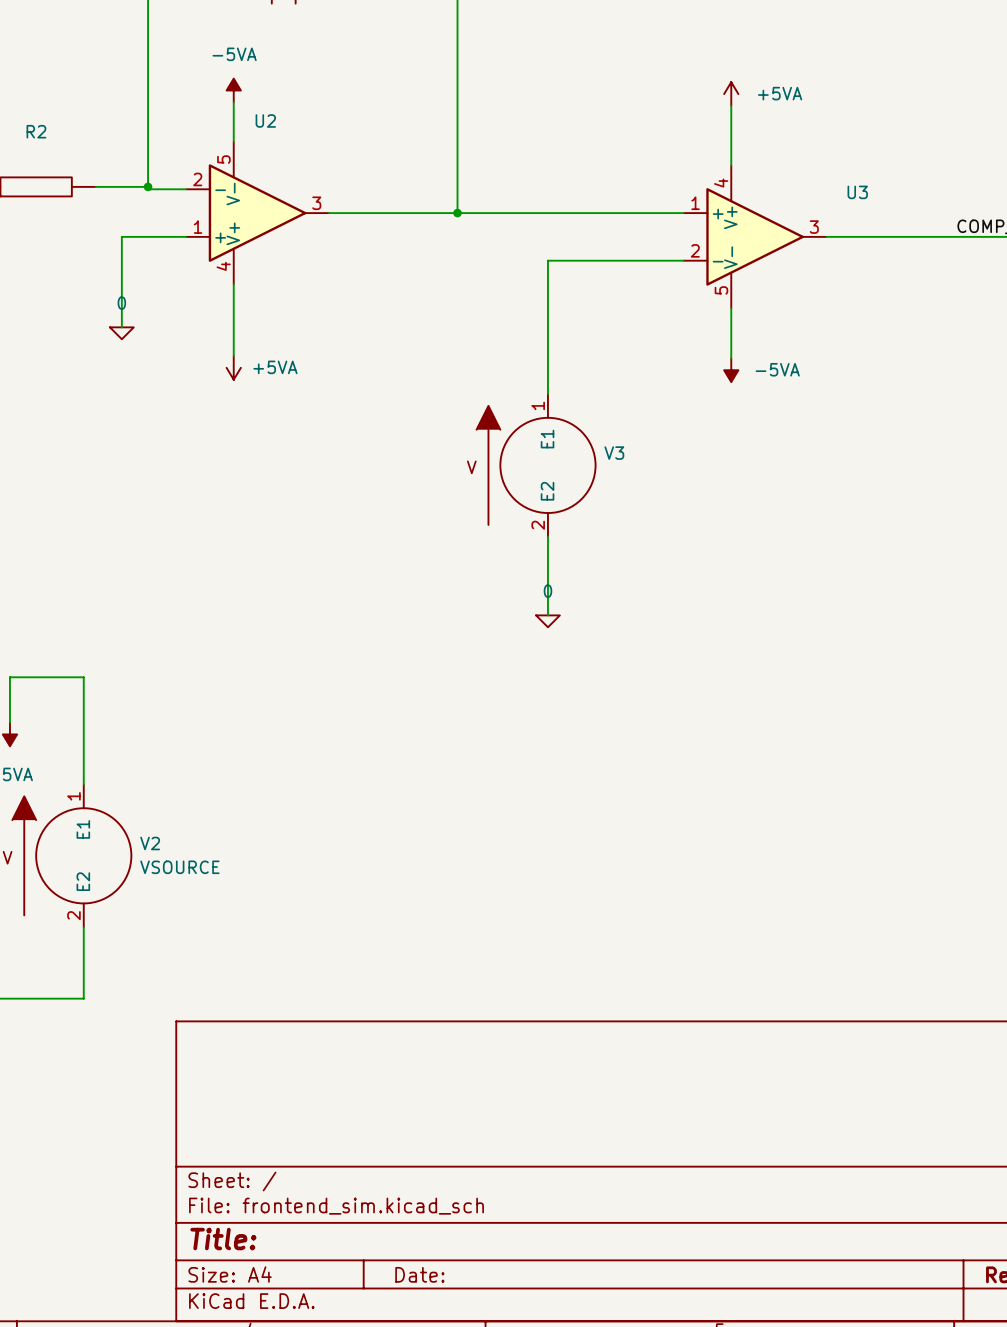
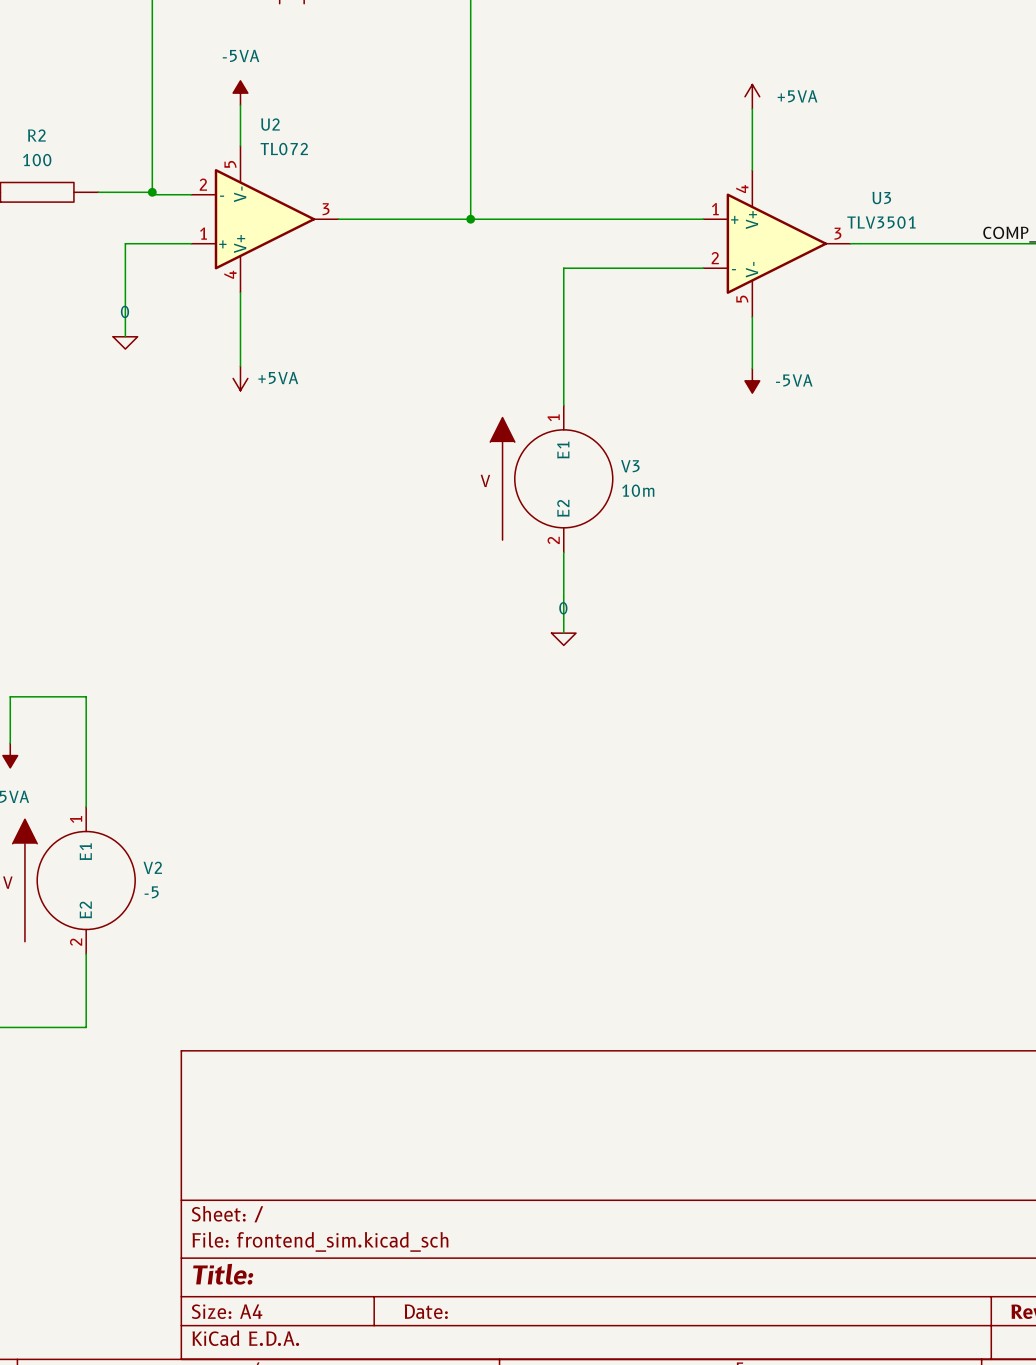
U2 value: none -> TL072 (284, 149)
R2 value: none -> 100 (37, 160)
U3 value: none -> TLV3501 (881, 222)
V3 value: none -> 10m (638, 490)
V2 value: VSOURCE (179, 867) -> -5 (151, 892)

